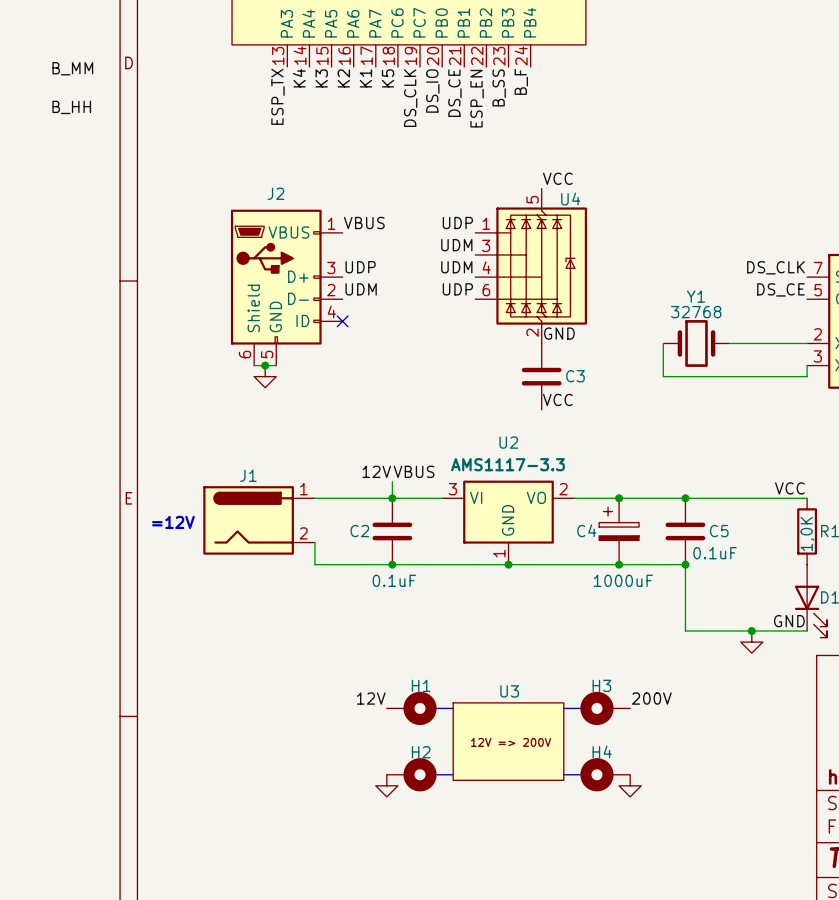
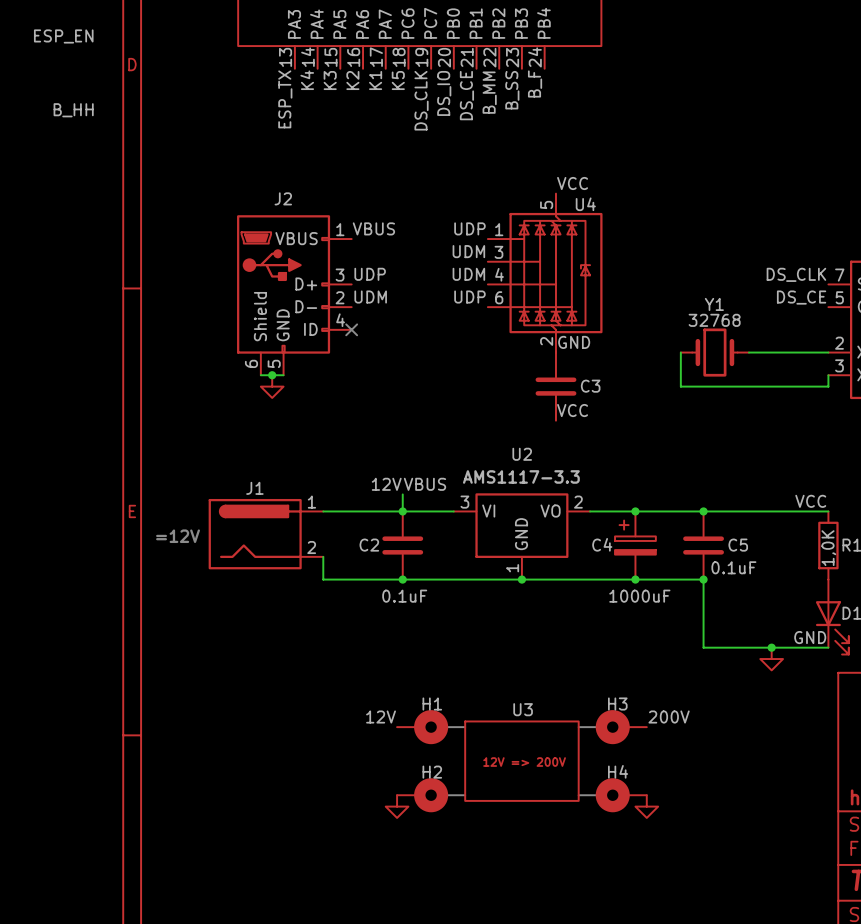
label: none -> ESP_EN (63, 36)
label: B_MM (72, 68) -> none
label: ESP_EN (477, 98) -> B_MM (489, 92)

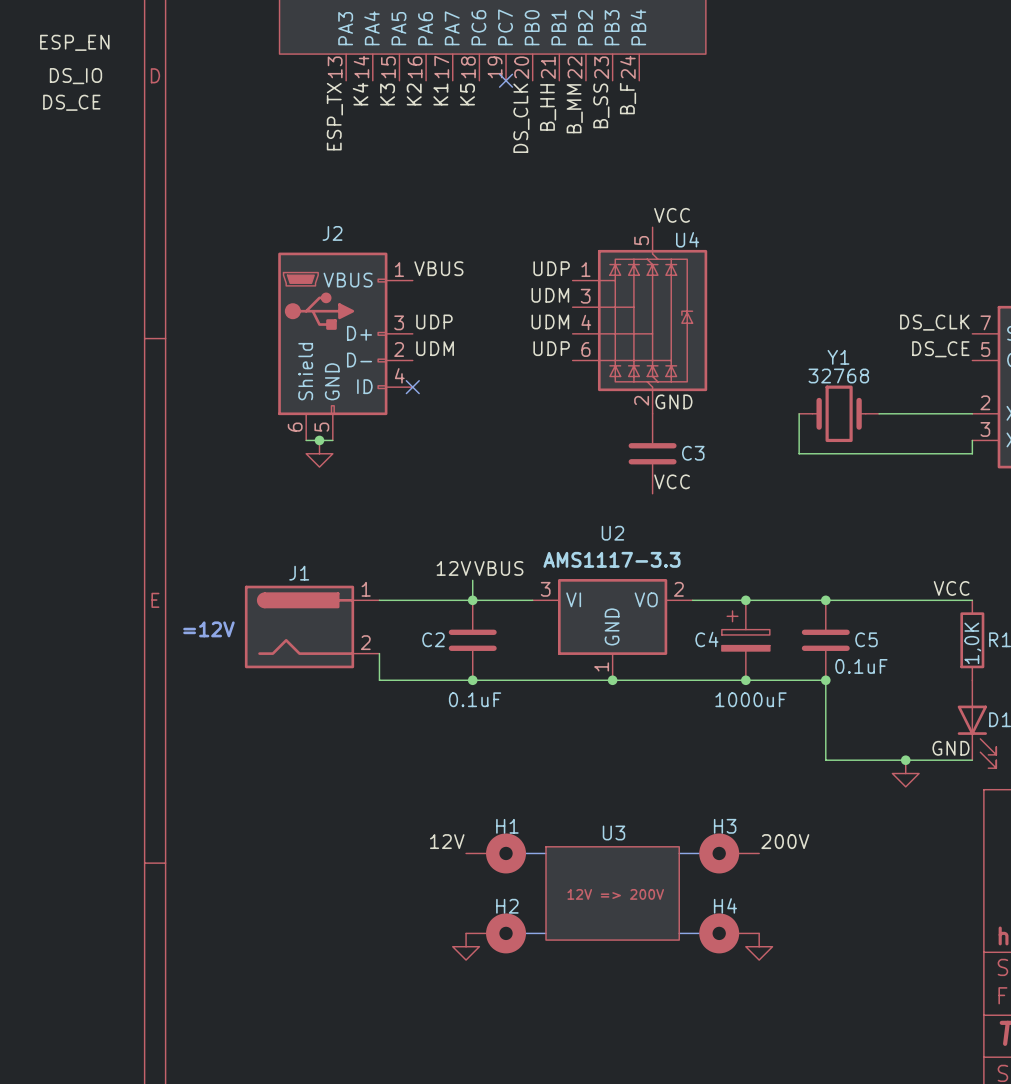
label: none -> DS_IO (75, 76)
no-connect mark: none -> (506, 80)
label: none -> DS_CE (71, 102)
label: DS_IO (444, 93) -> DS_CLK (521, 118)
label: DS_CE (466, 95) -> B_HH (548, 107)
label: DS_CLK (421, 100) -> none
label: B_HH (73, 110) -> none

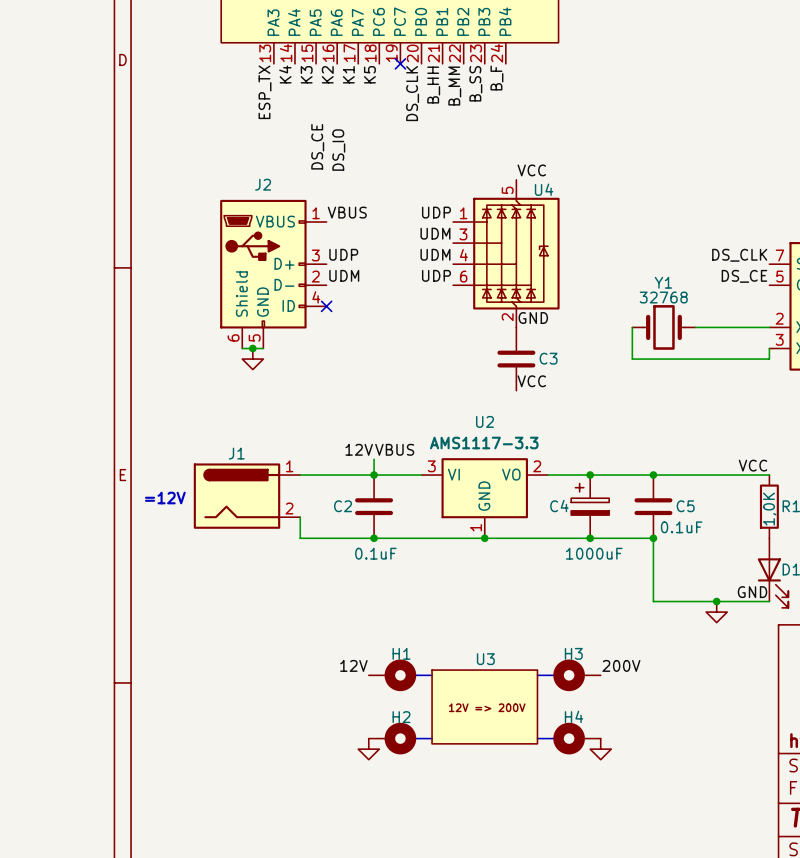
label: ESP_EN (74, 42) -> none
label: DS_IO (75, 76) -> none
label: DS_CE (71, 102) -> none
label: none -> DS_CE (317, 146)
label: none -> DS_IO (338, 150)

